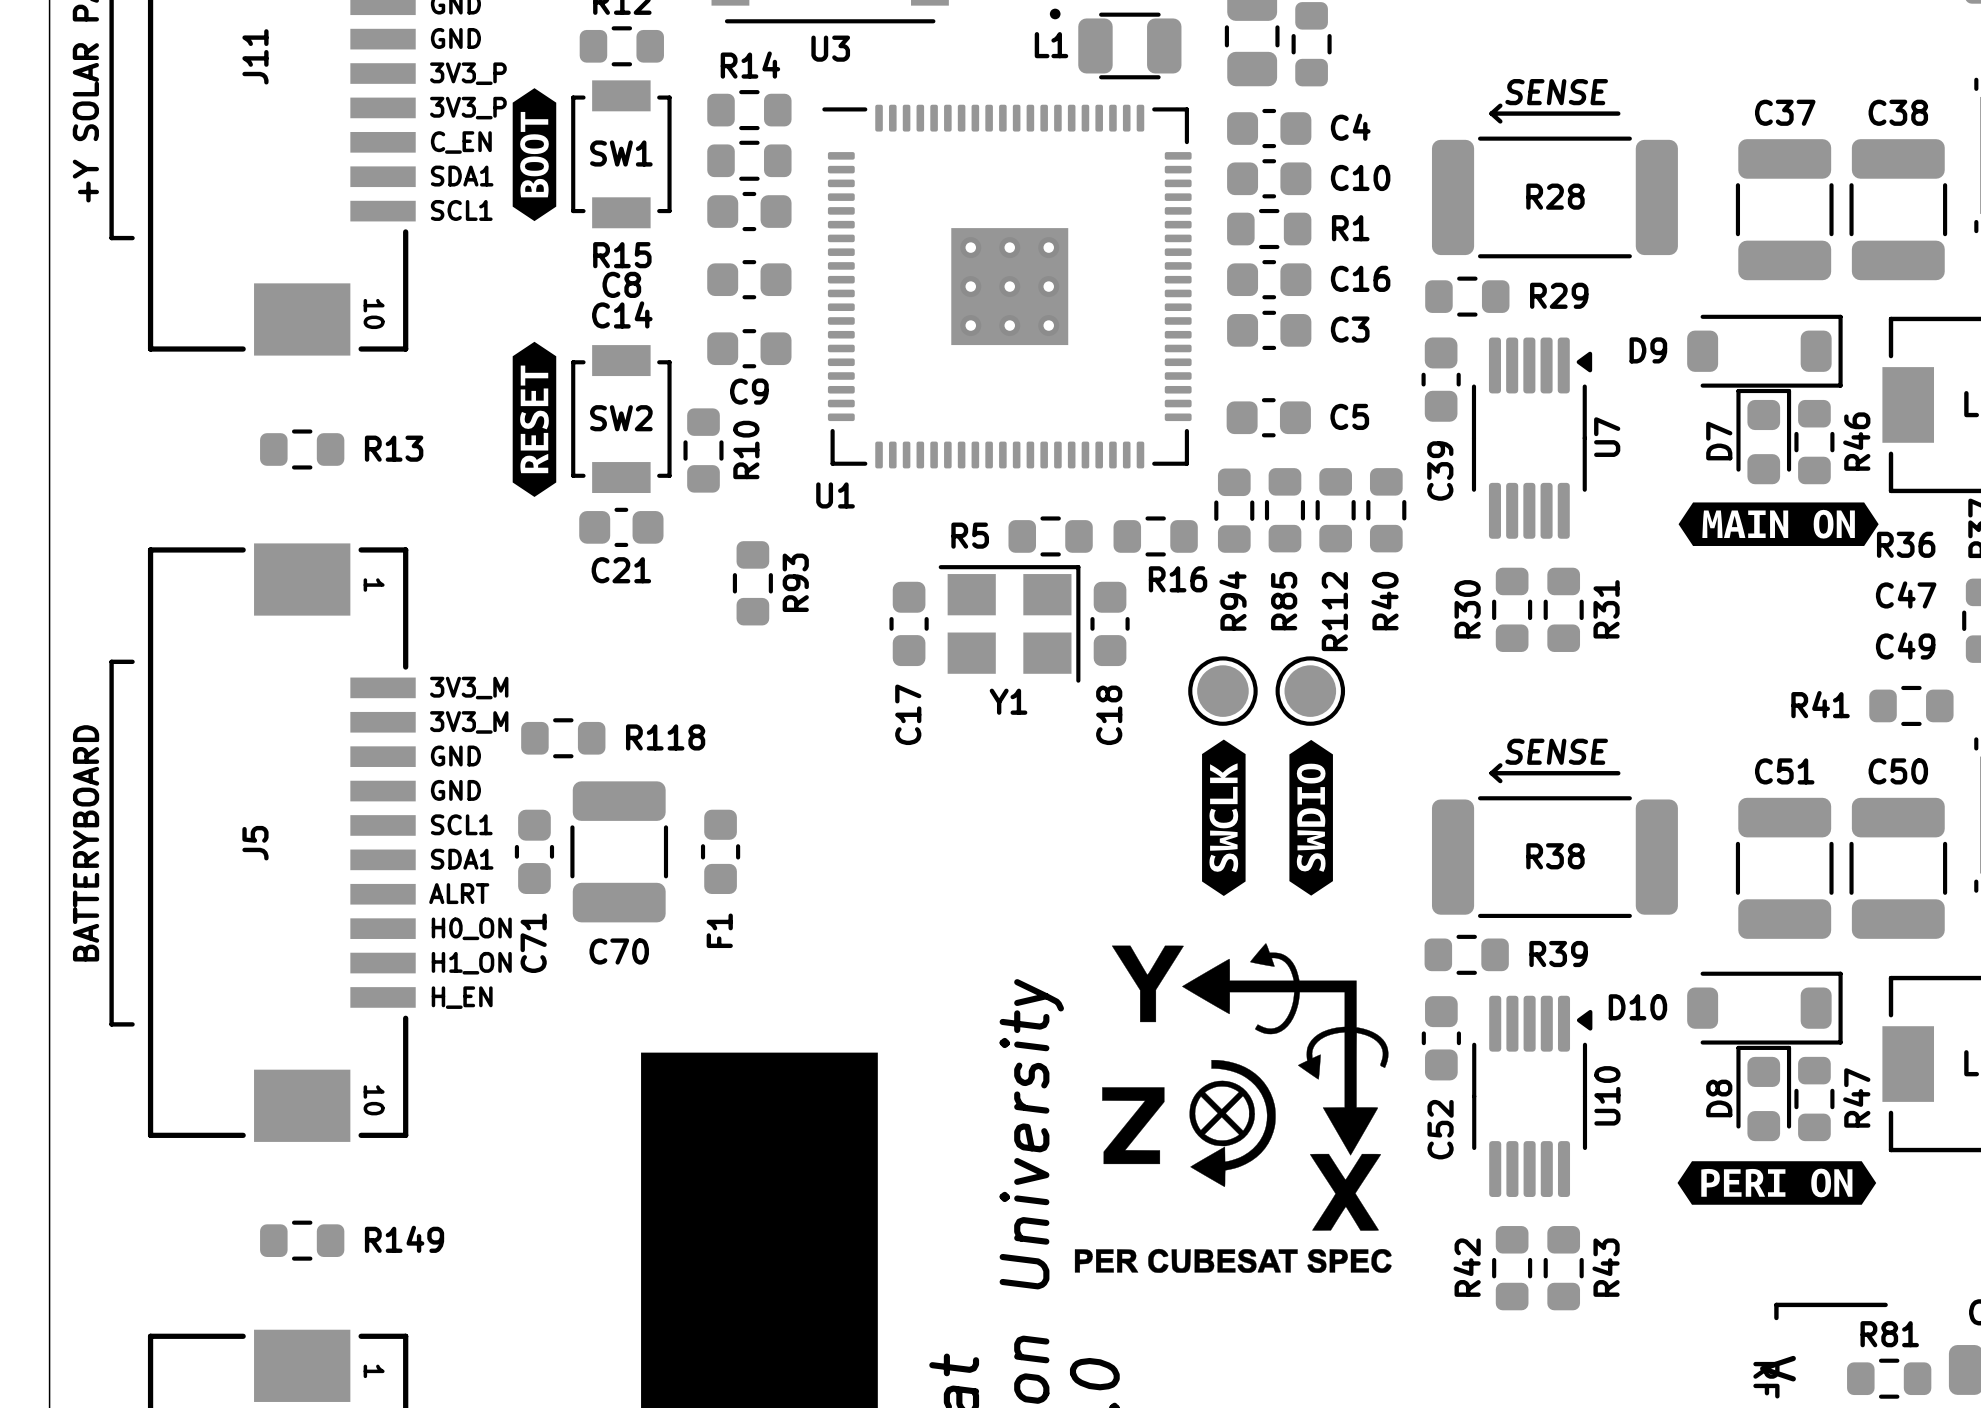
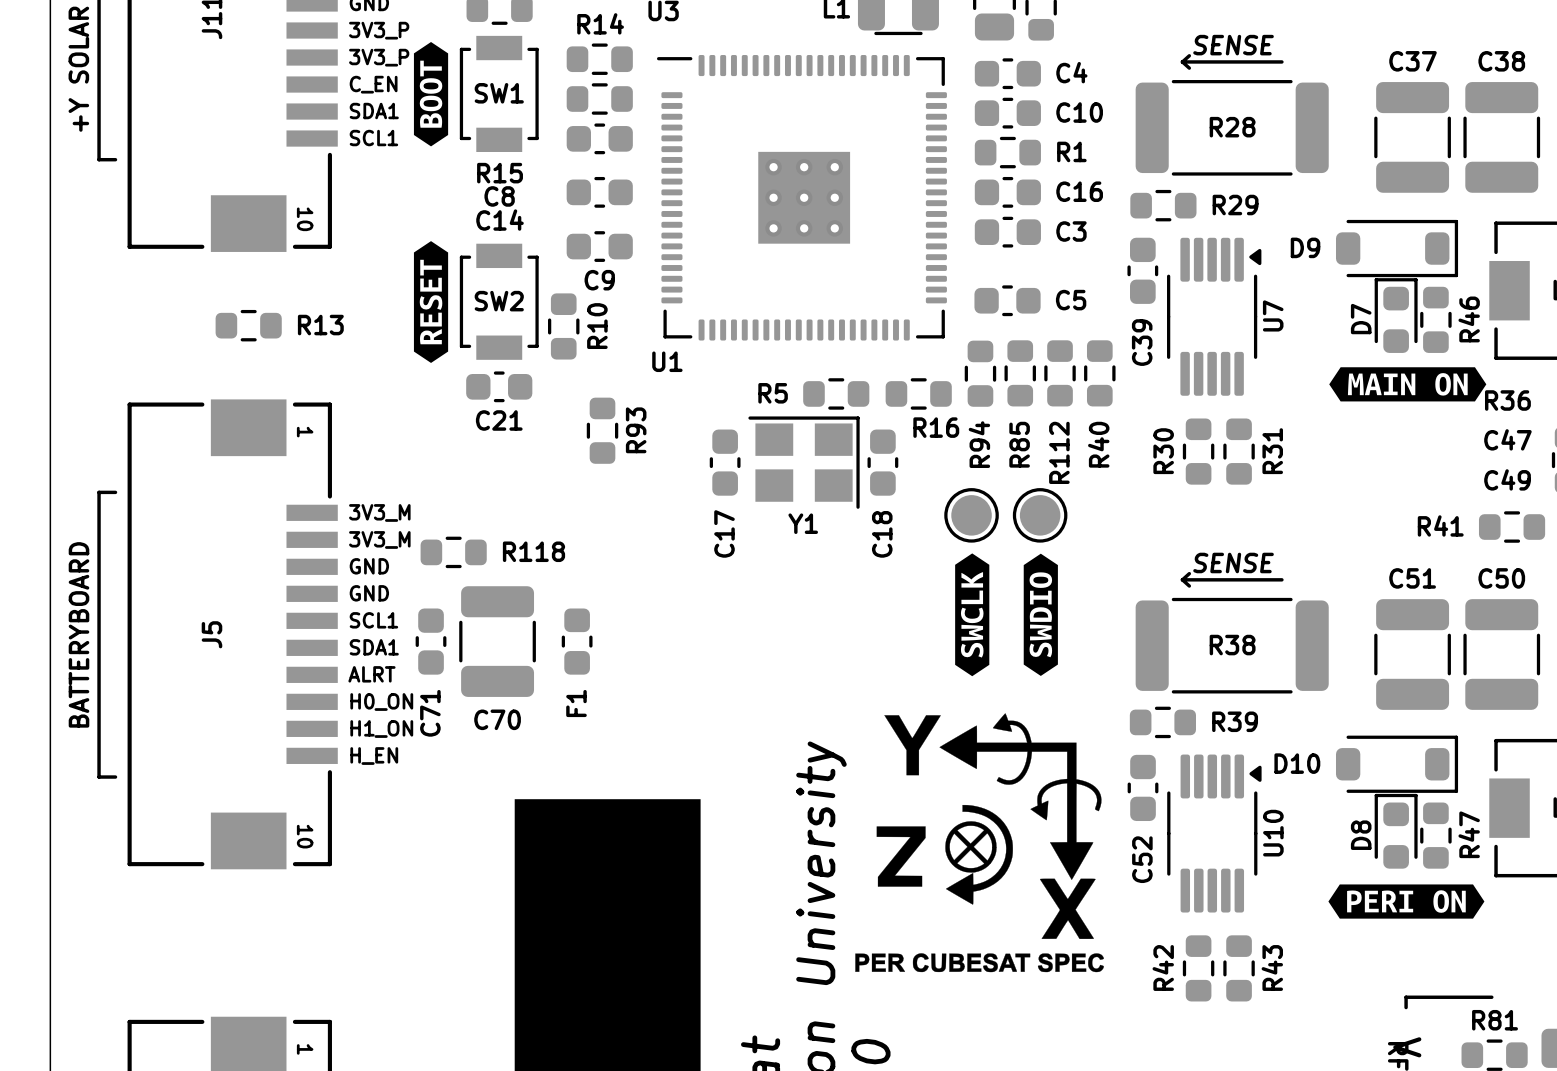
R149: (302, 1240) -> none

